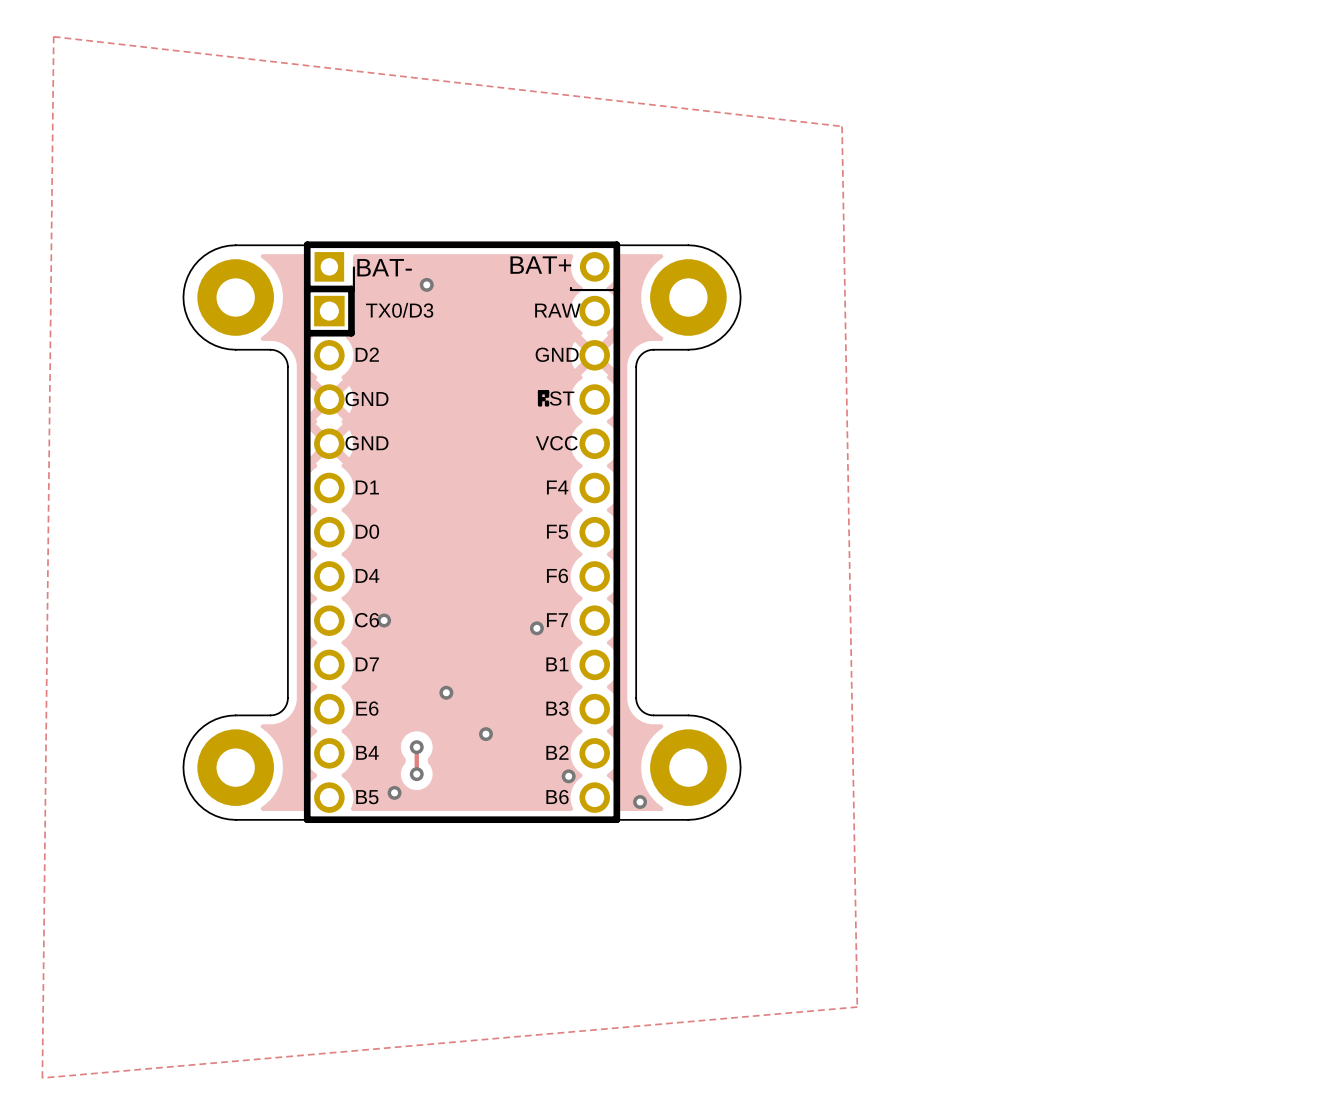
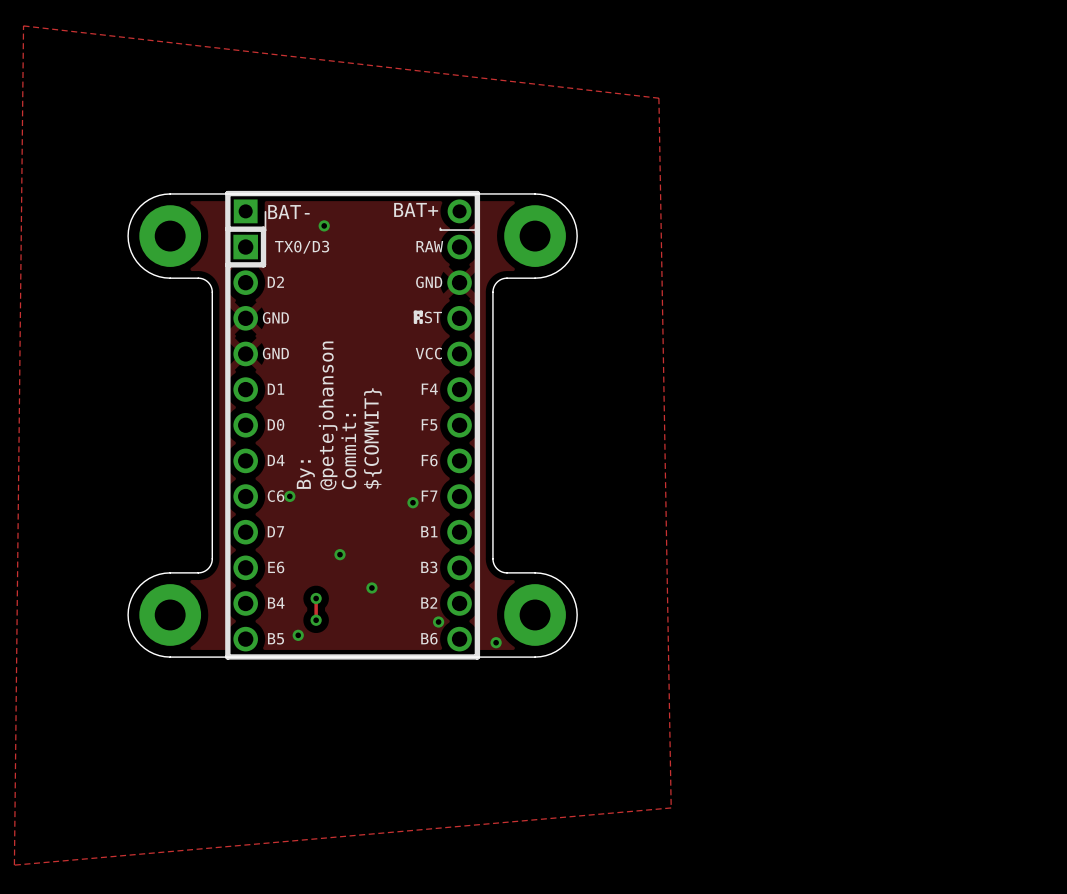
text: none -> @petejohanson (328, 415)
text: none -> ${COMMIT} (372, 438)
text: none -> Commit: (348, 451)
text: none -> By: (305, 474)

